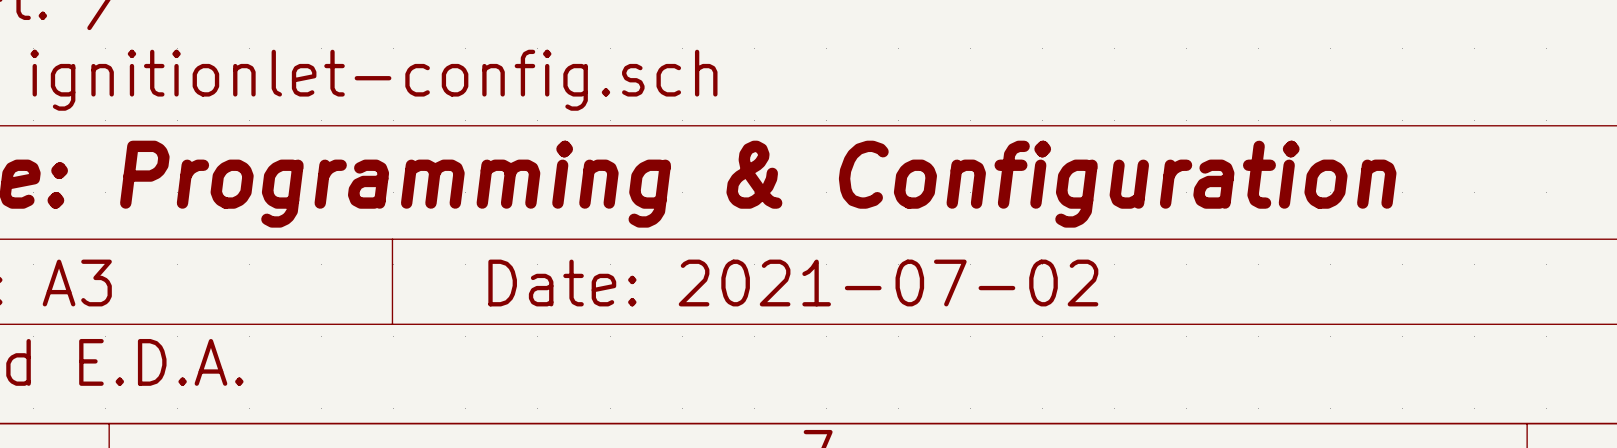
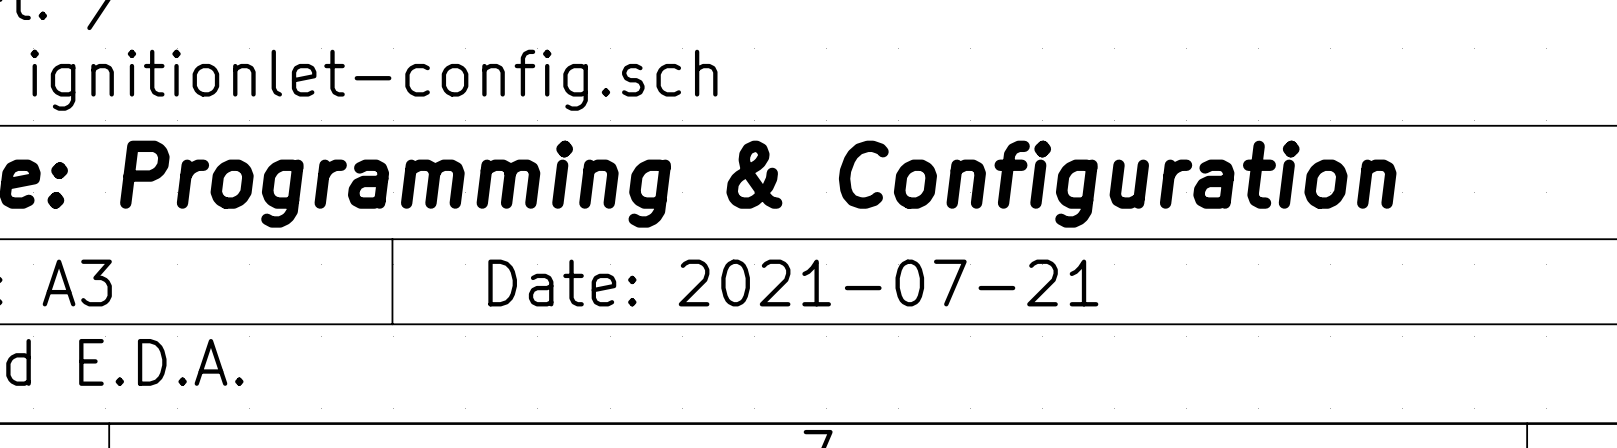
title block: Date: 2021-07-02 (793, 283) -> Date: 2021-07-21 (793, 283)

